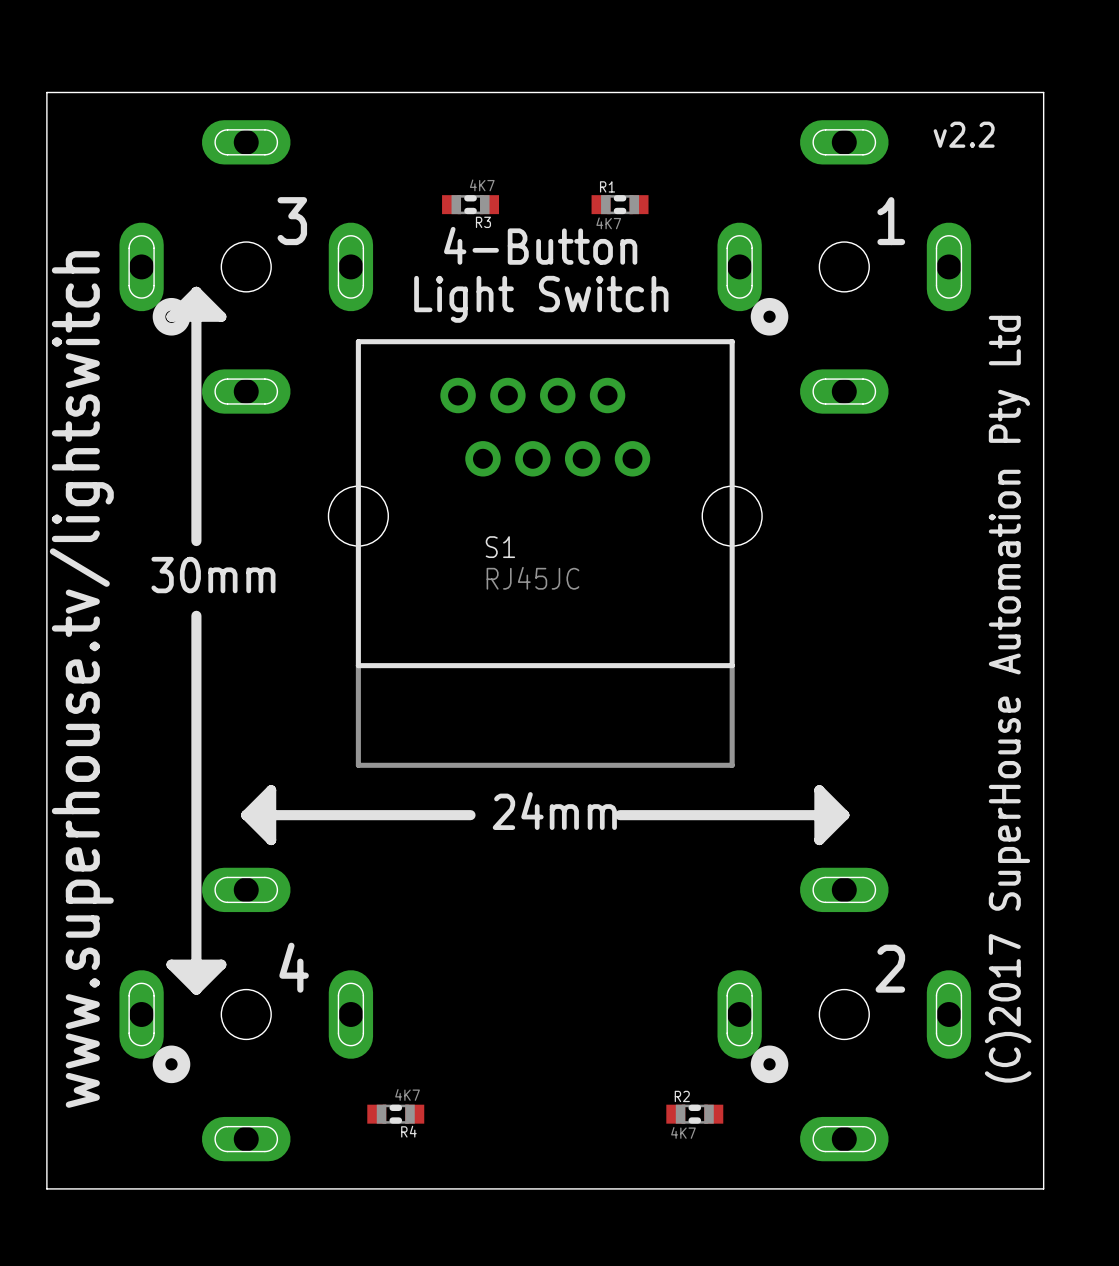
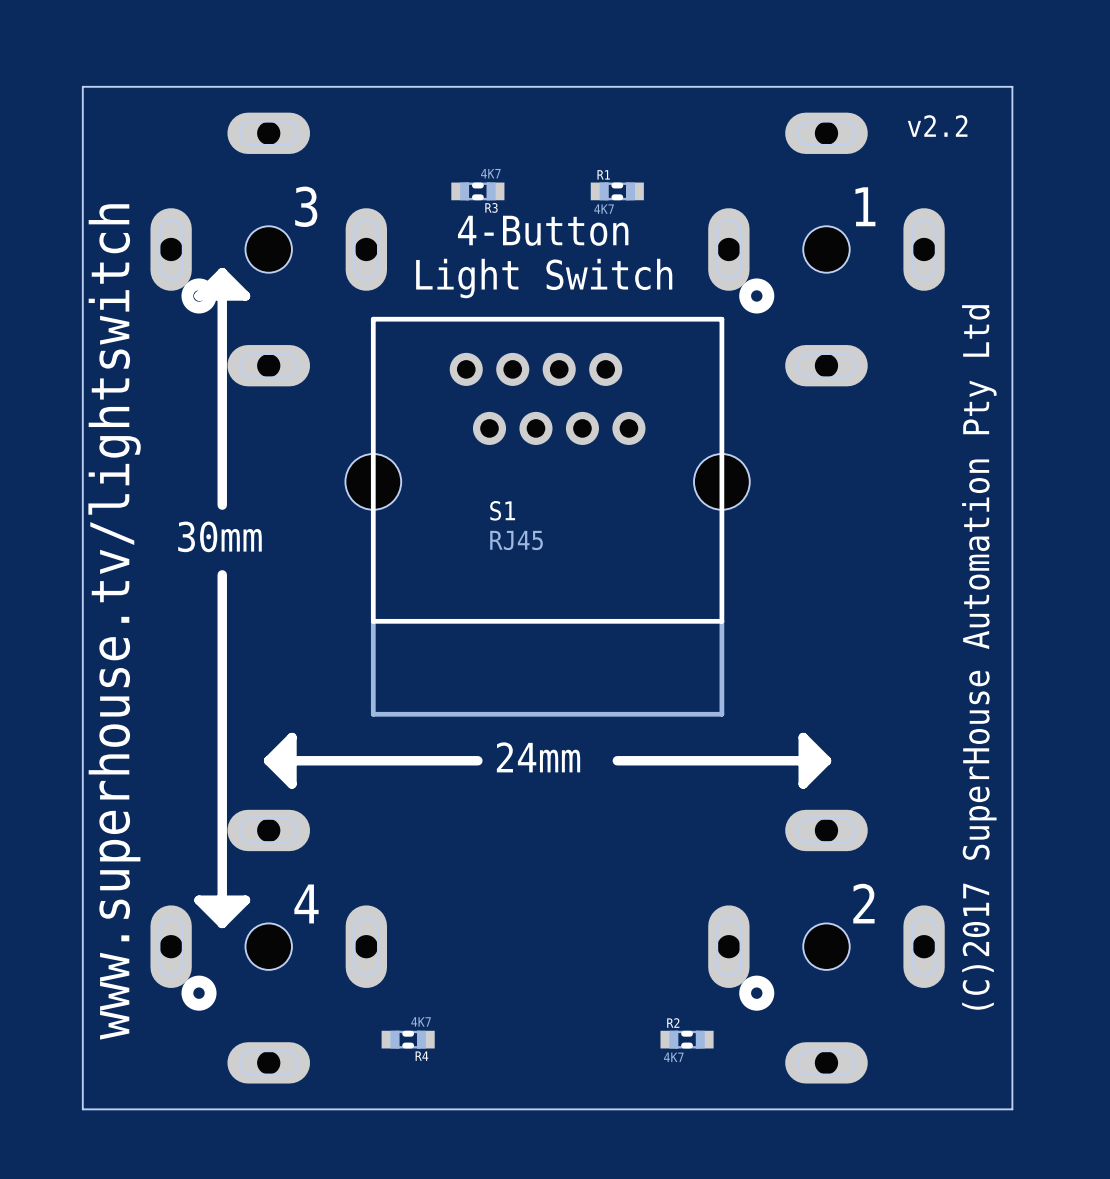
S1 value: RJ45JC (532, 578) -> RJ45 (516, 540)

